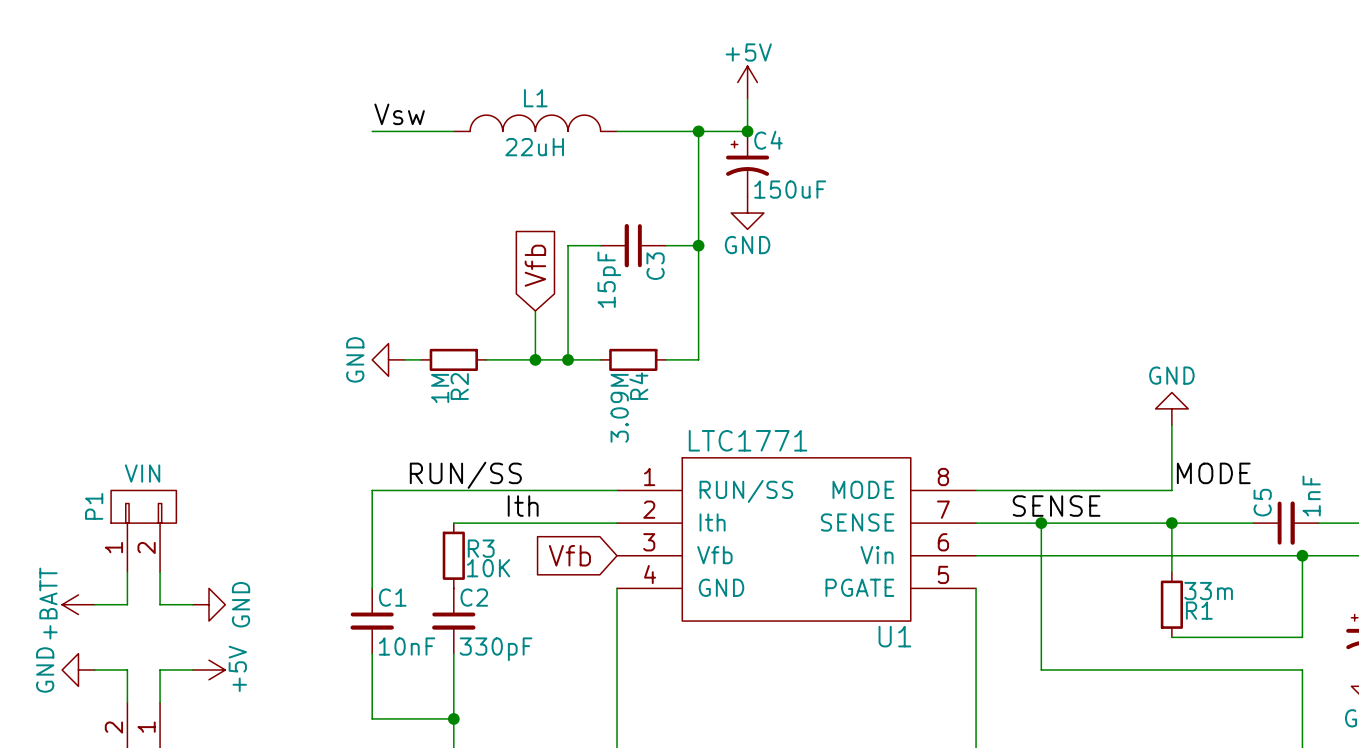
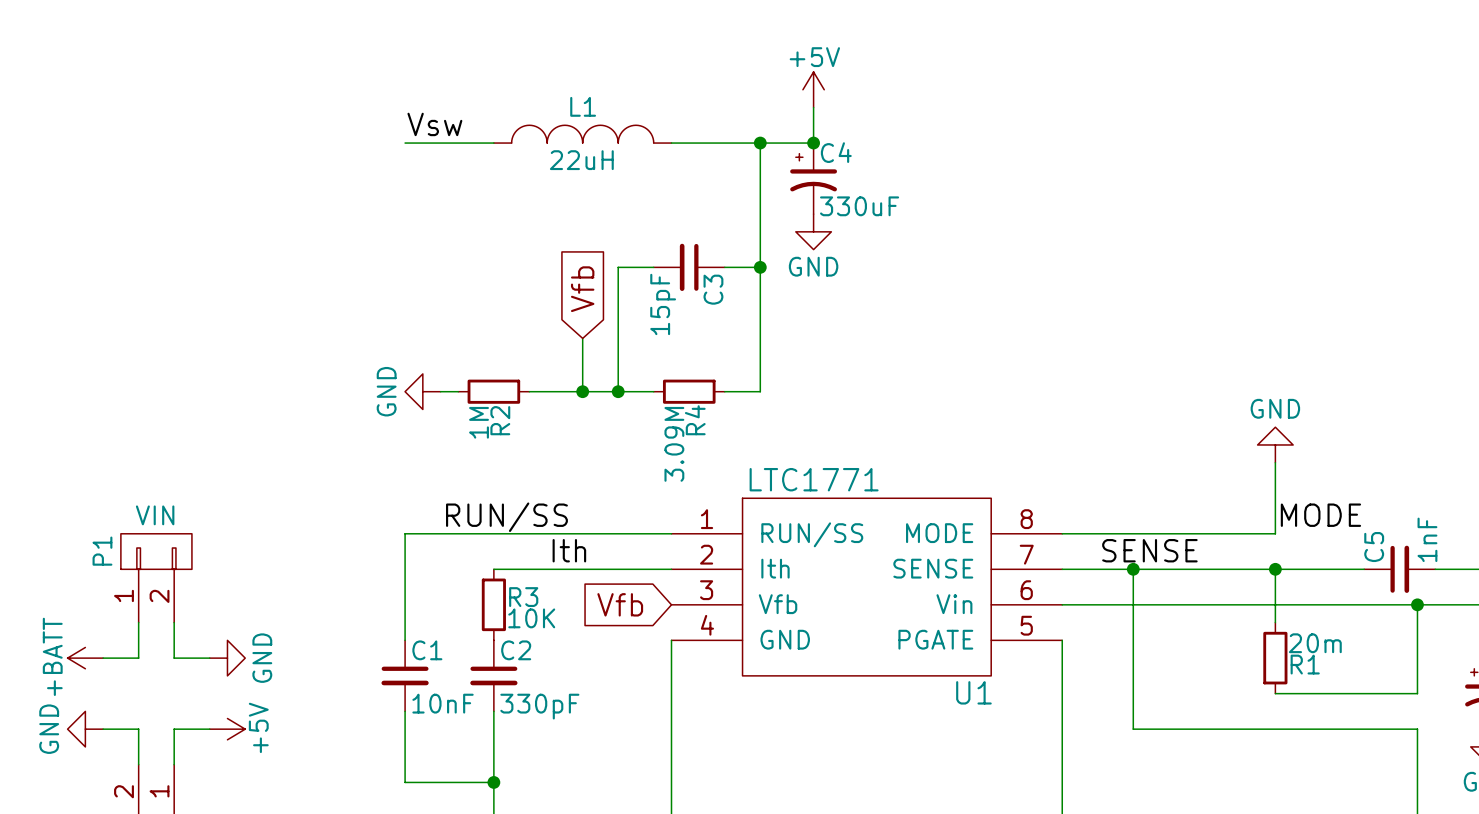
C4 value: 150uF (790, 189) -> 330uF (859, 206)
R1 value: 33m (1208, 591) -> 20m (1315, 643)

